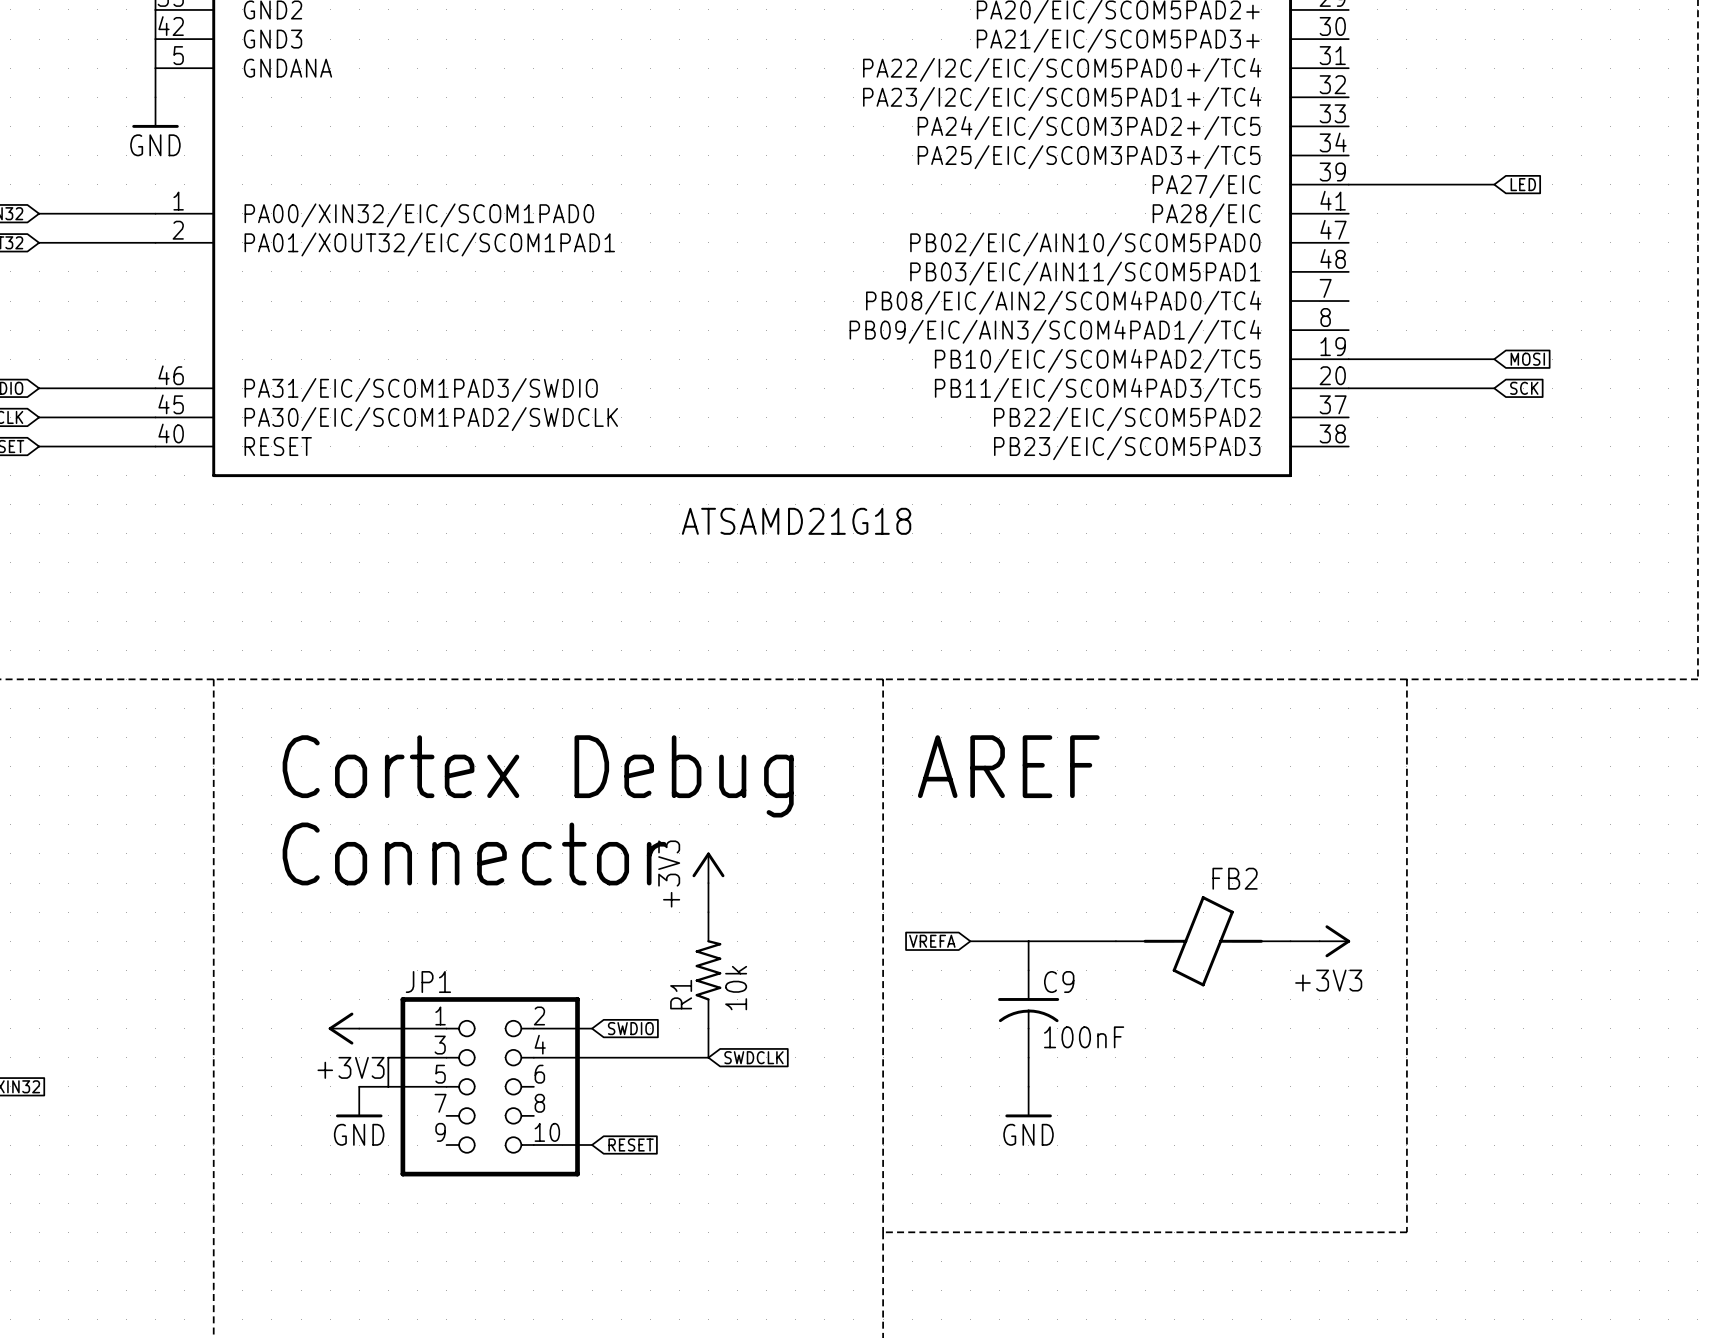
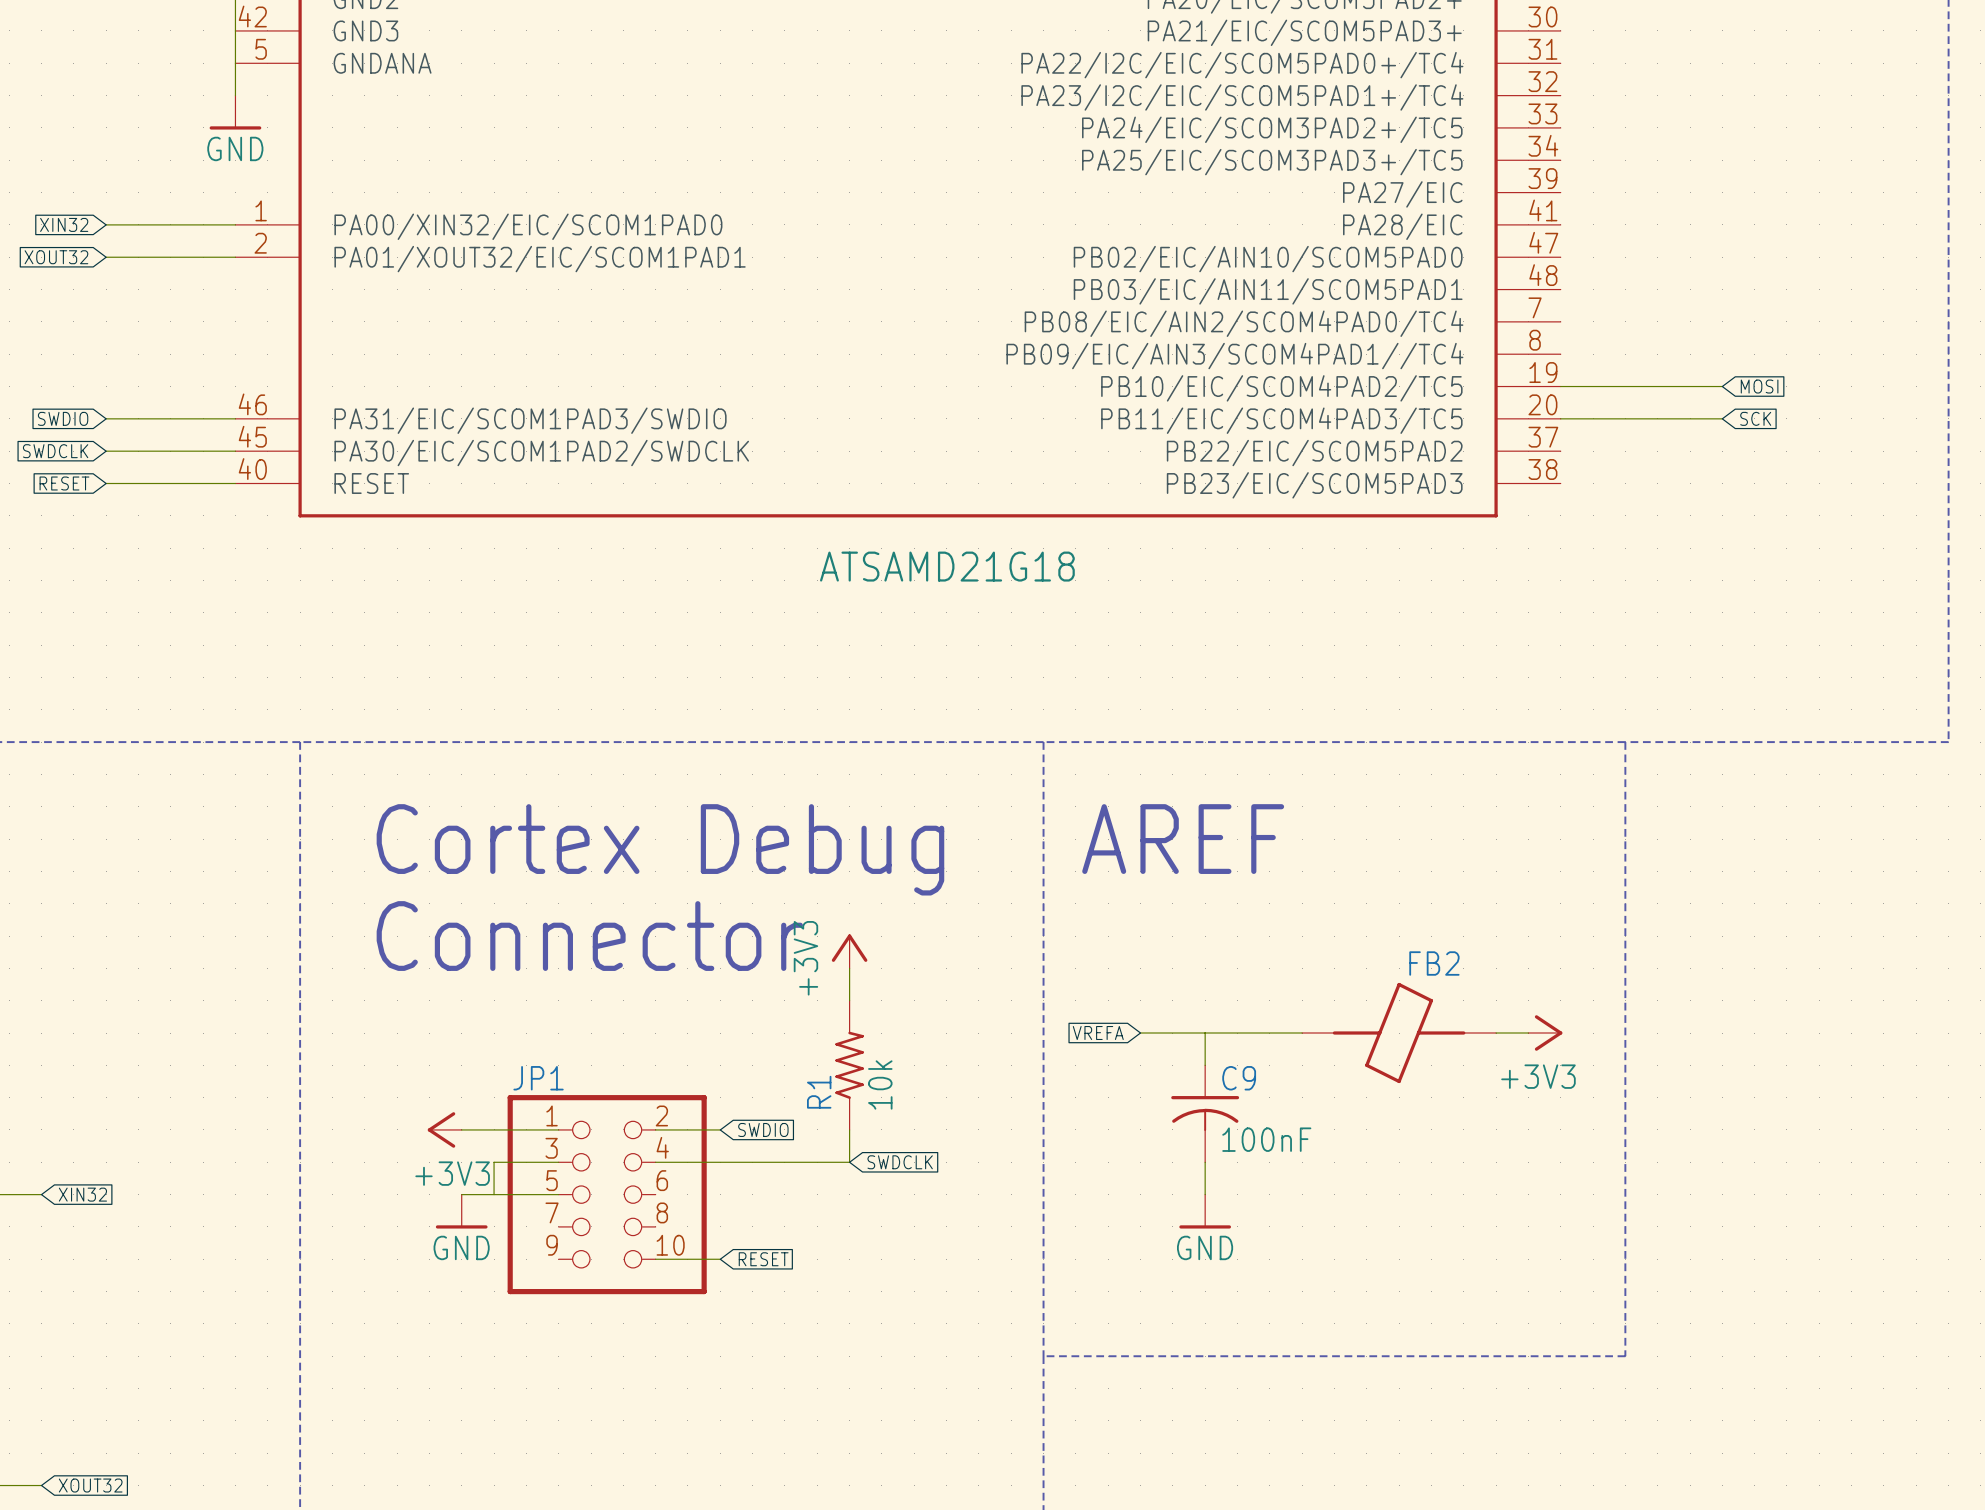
wire: (1348, 184) (1494, 184) -> none
global label: LED (1523, 184) -> none

